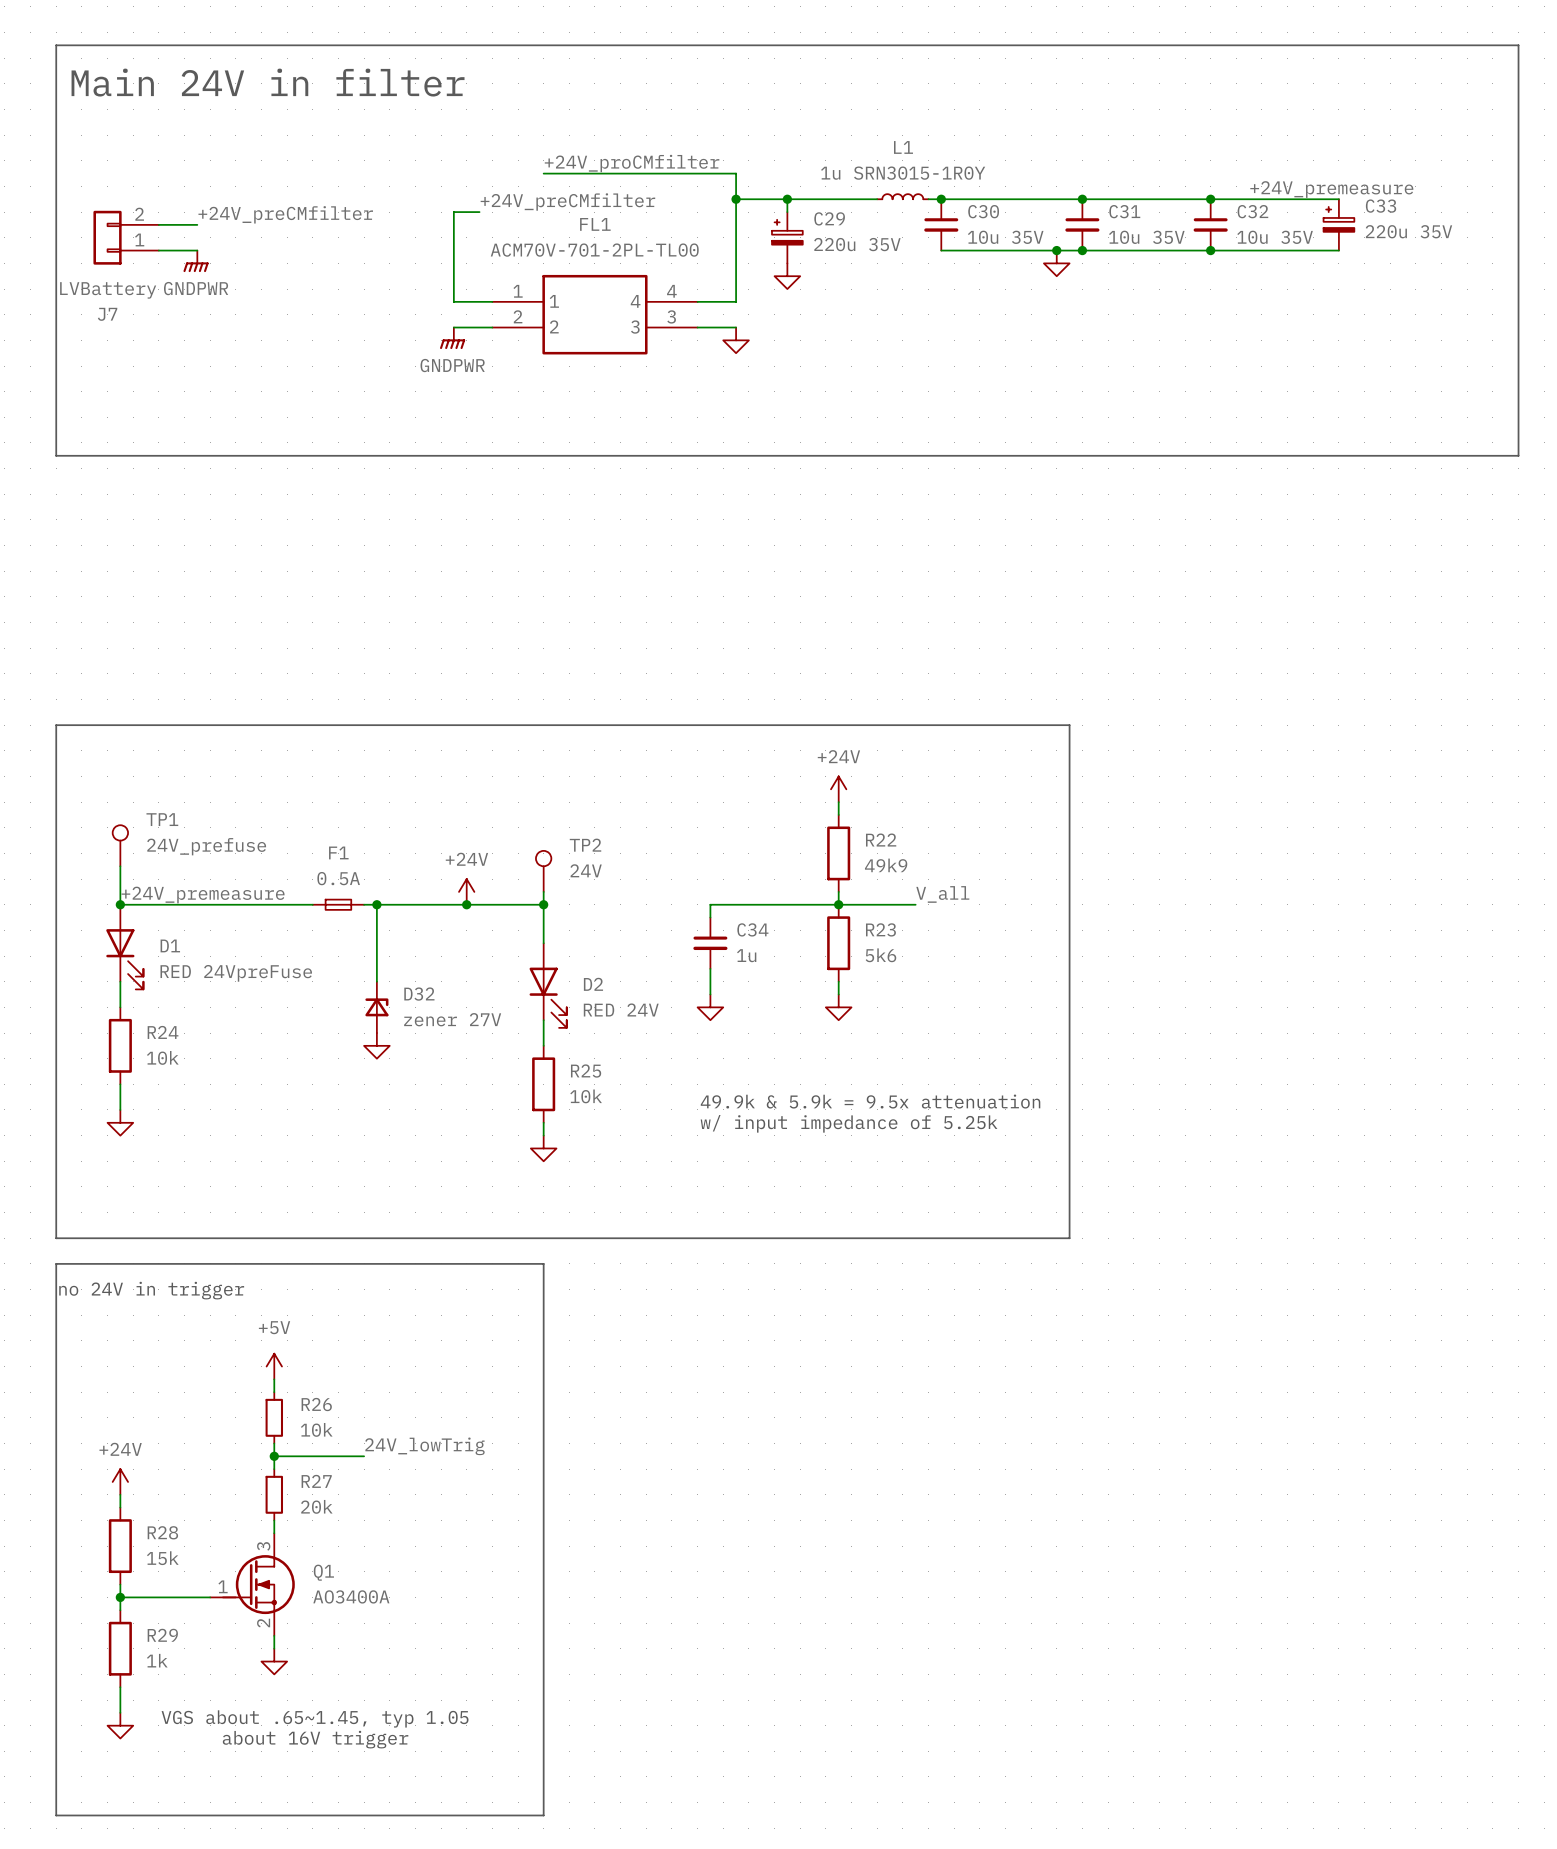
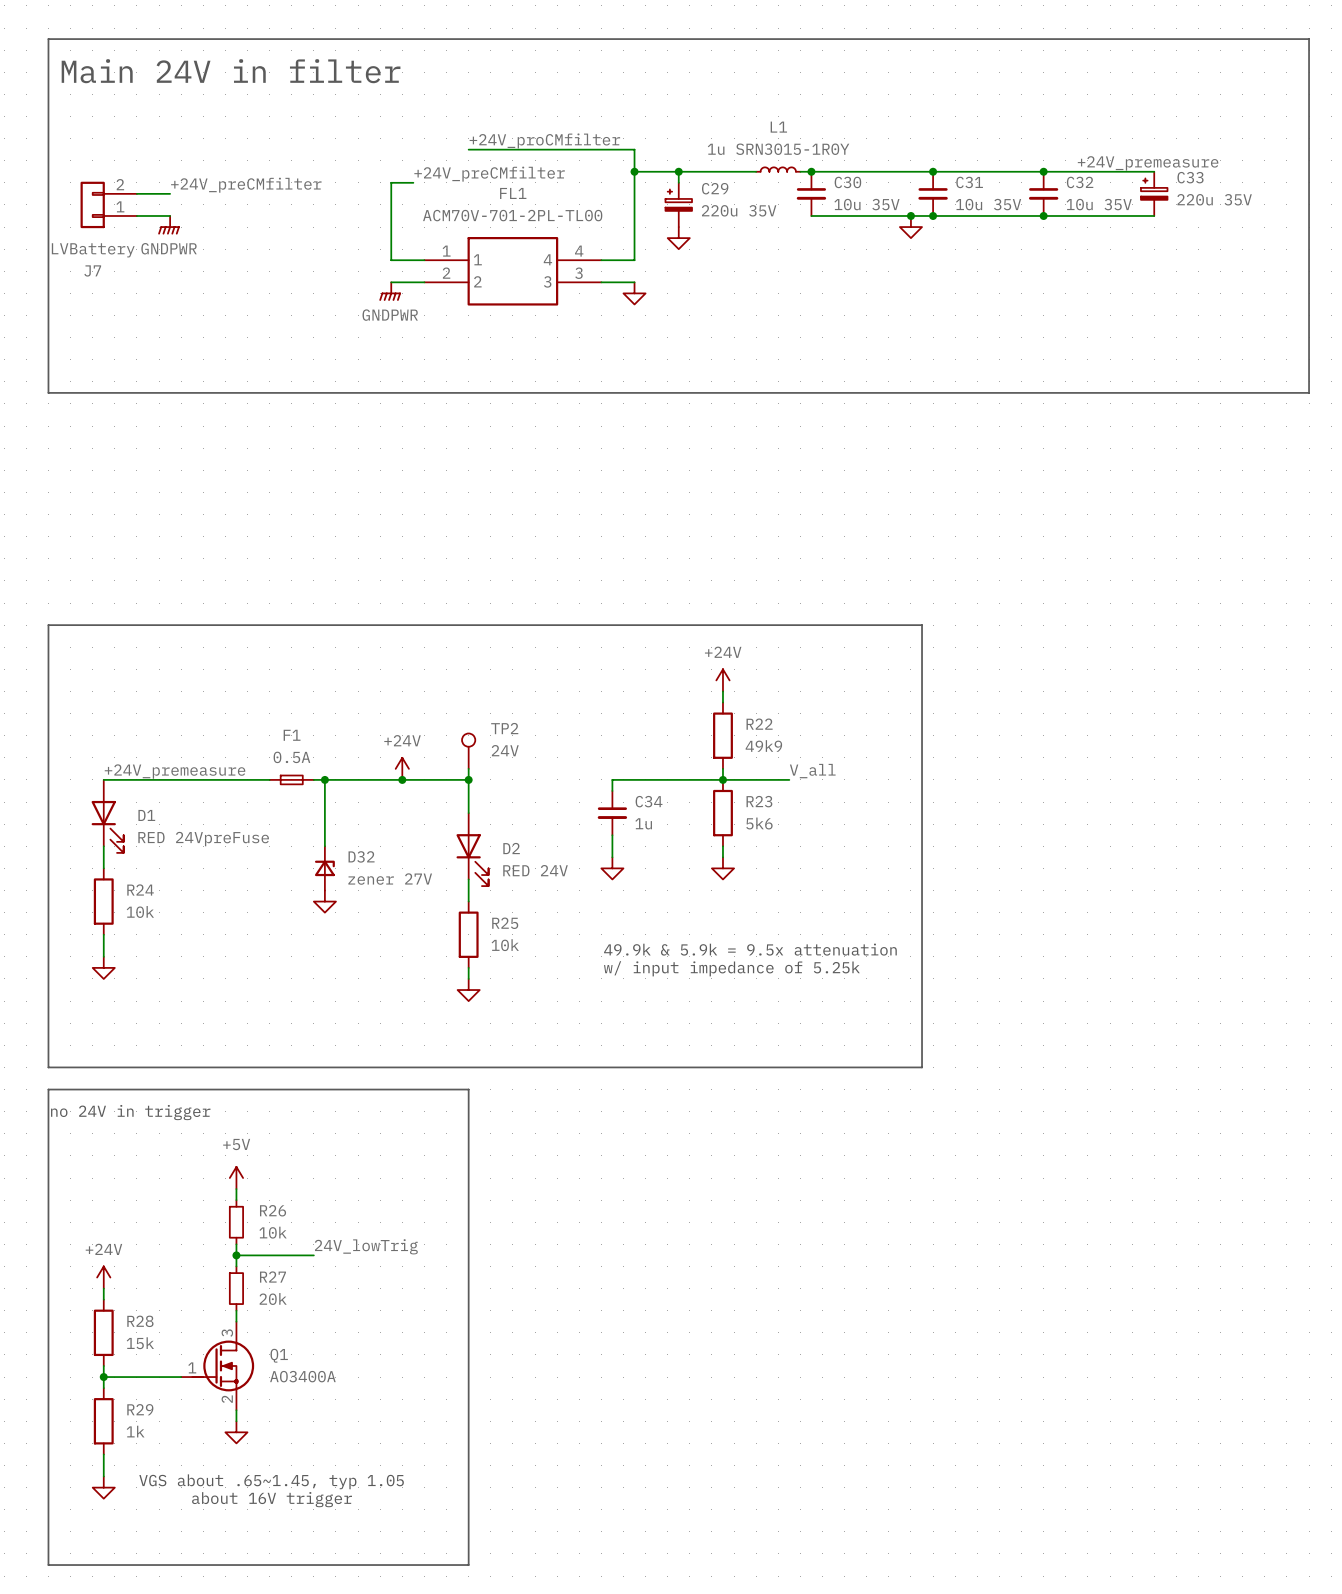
TP1: 24V_prefuse (120, 845) -> none
wire: (120, 866) (120, 904) -> none
junction: (120, 904) -> none

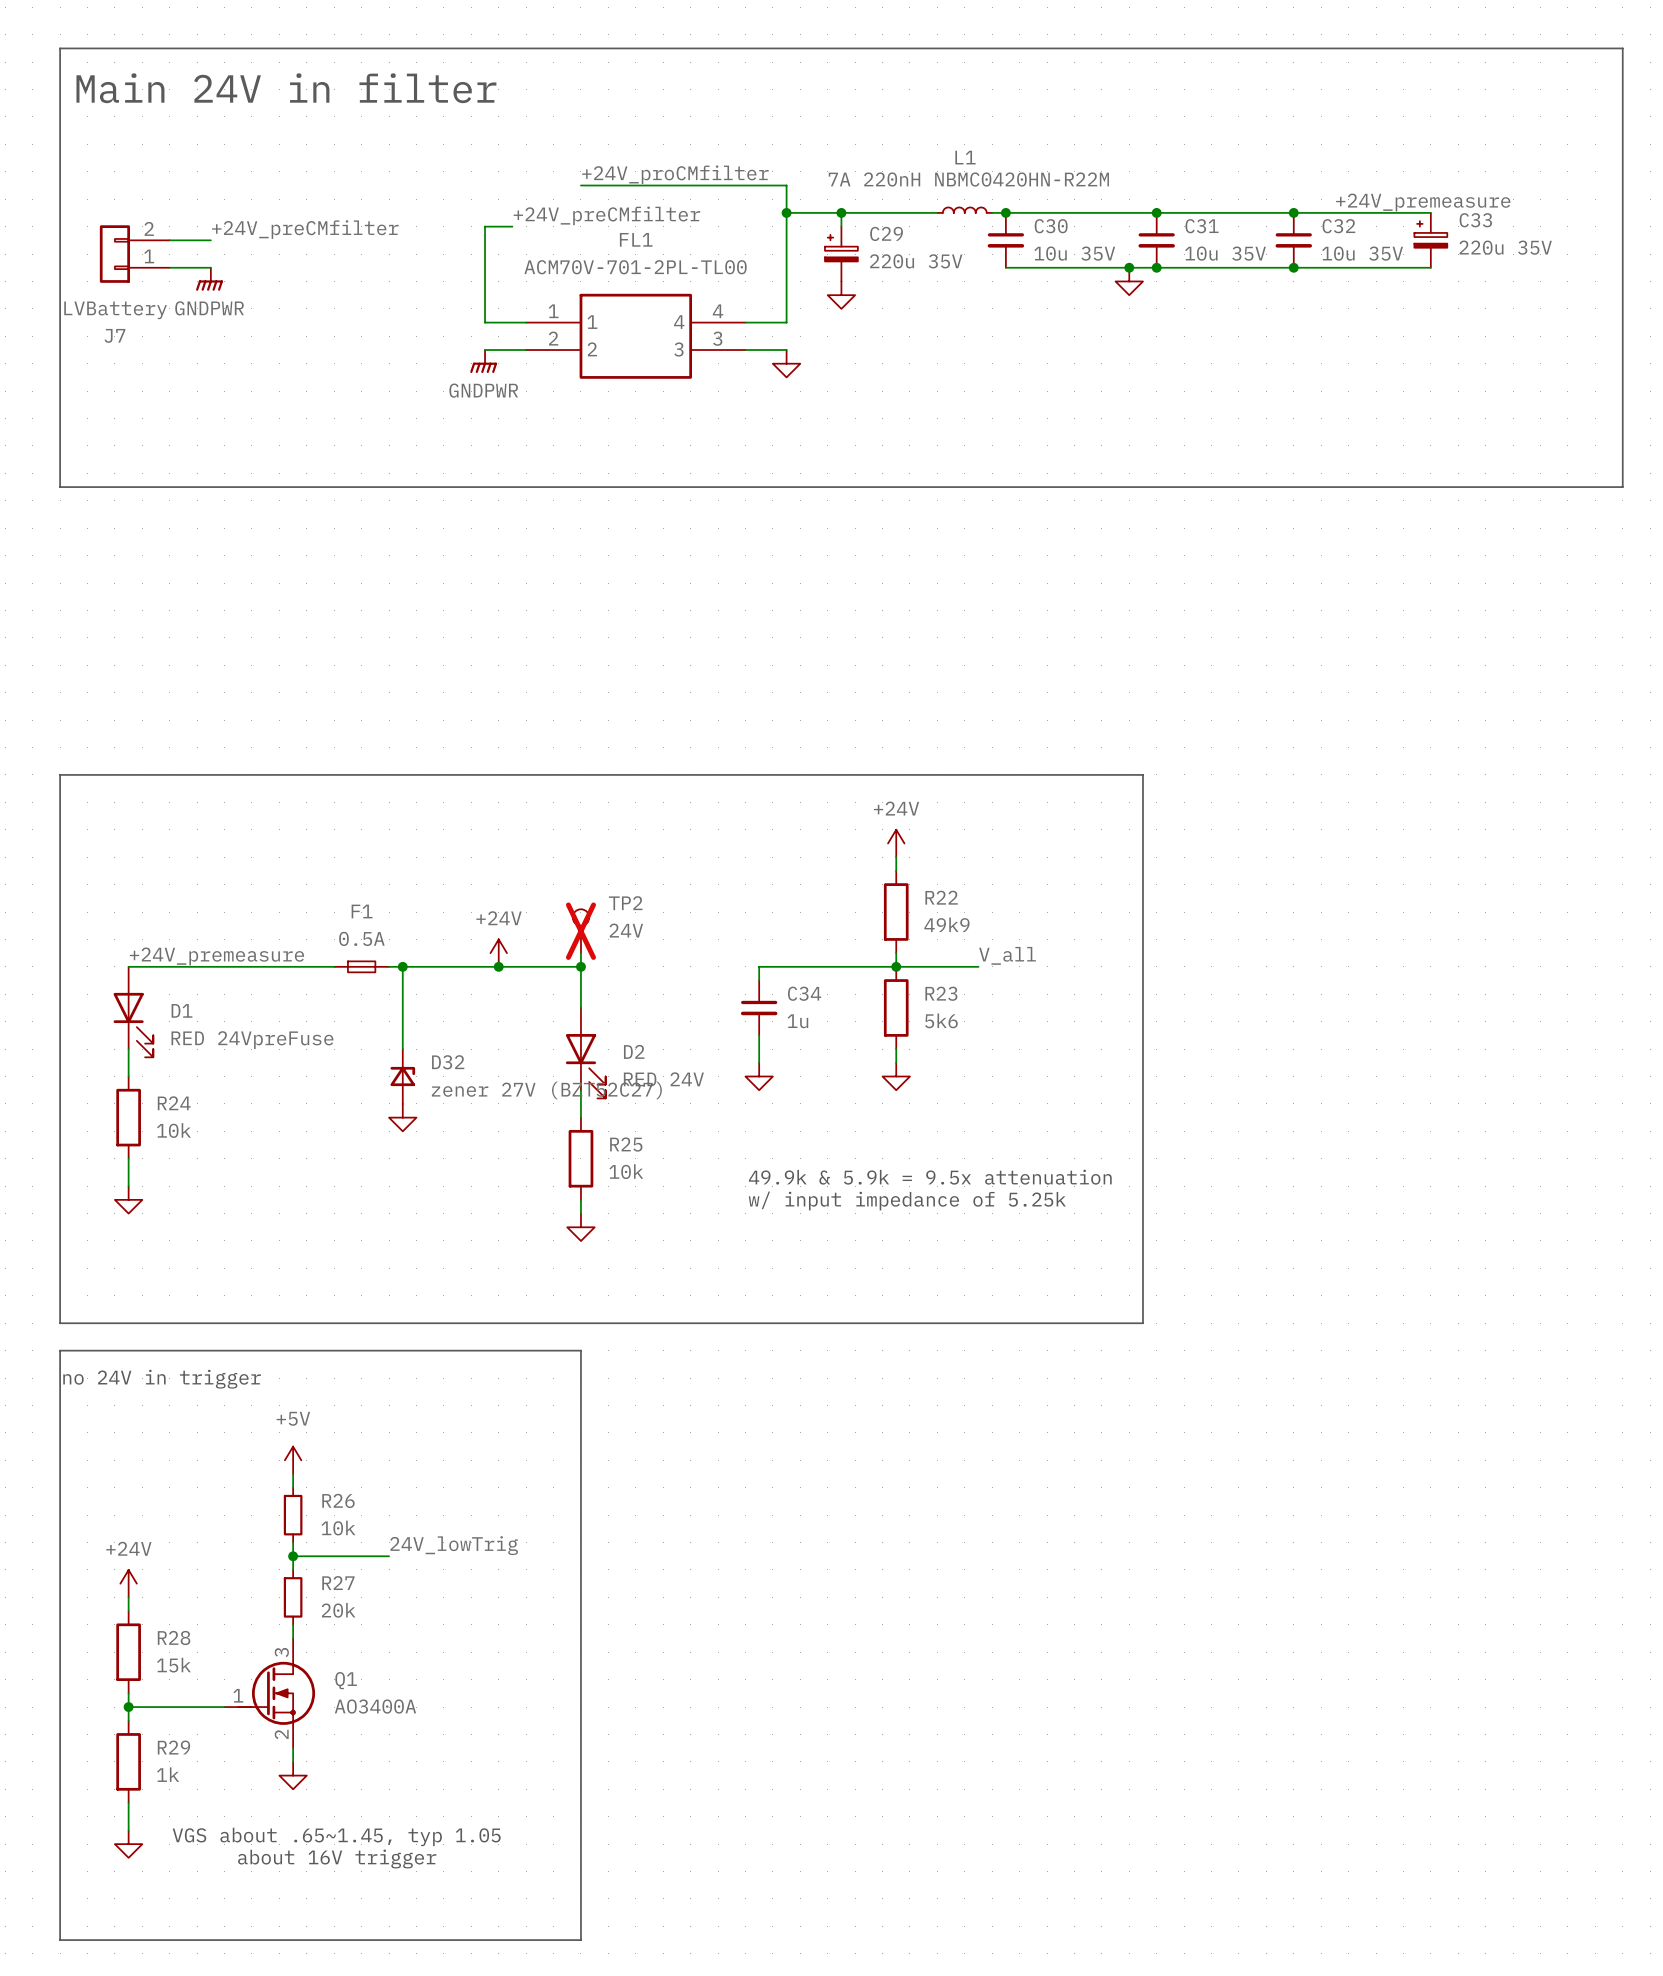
L1 value: 1u SRN3015-1R0Y (778, 149) -> 7A 220nH NBMC0420HN-R22M (968, 179)
TP2 do-not-place cross: none -> (580, 931)
D32 value: zener 27V (390, 879) -> zener 27V (BZT52C27) (546, 1090)

